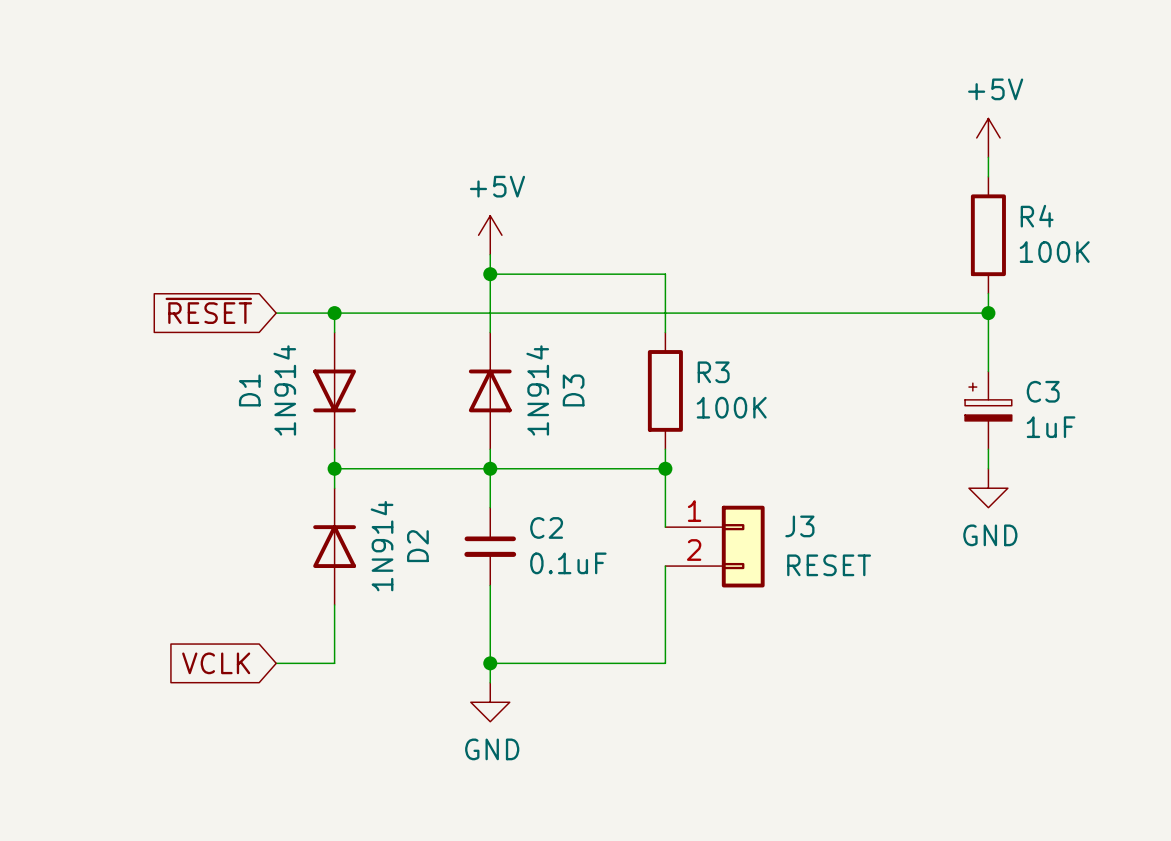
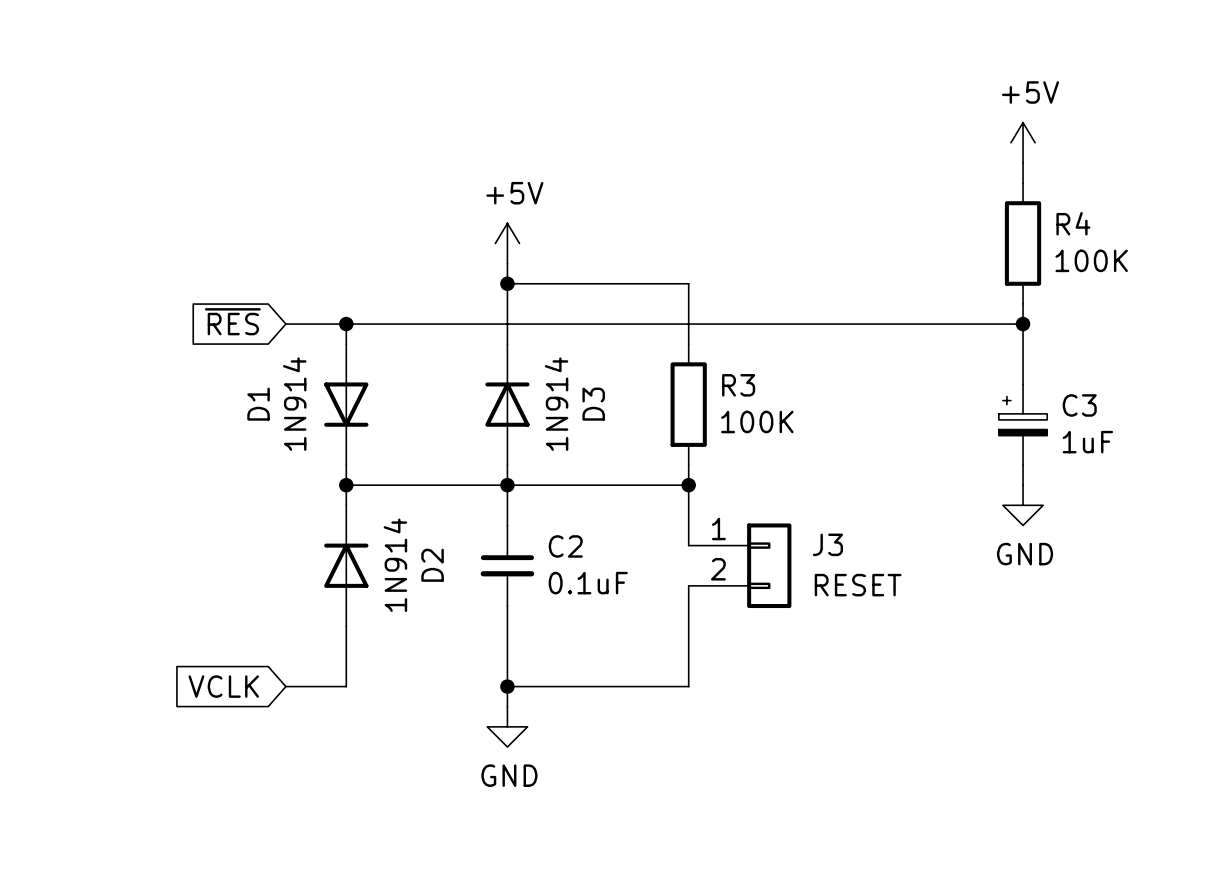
global label: ~{RESET} (208, 310) -> ~{RES} (232, 321)

